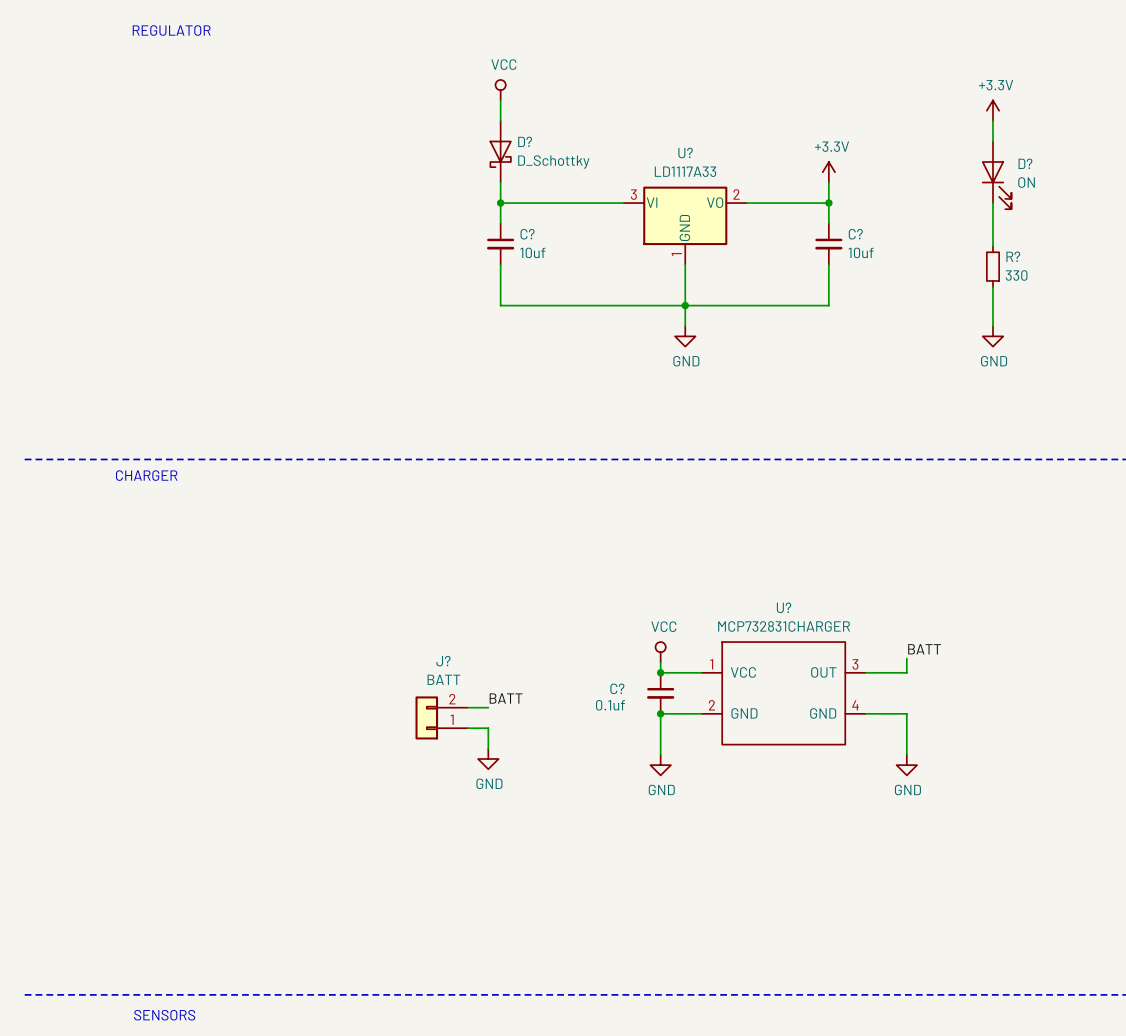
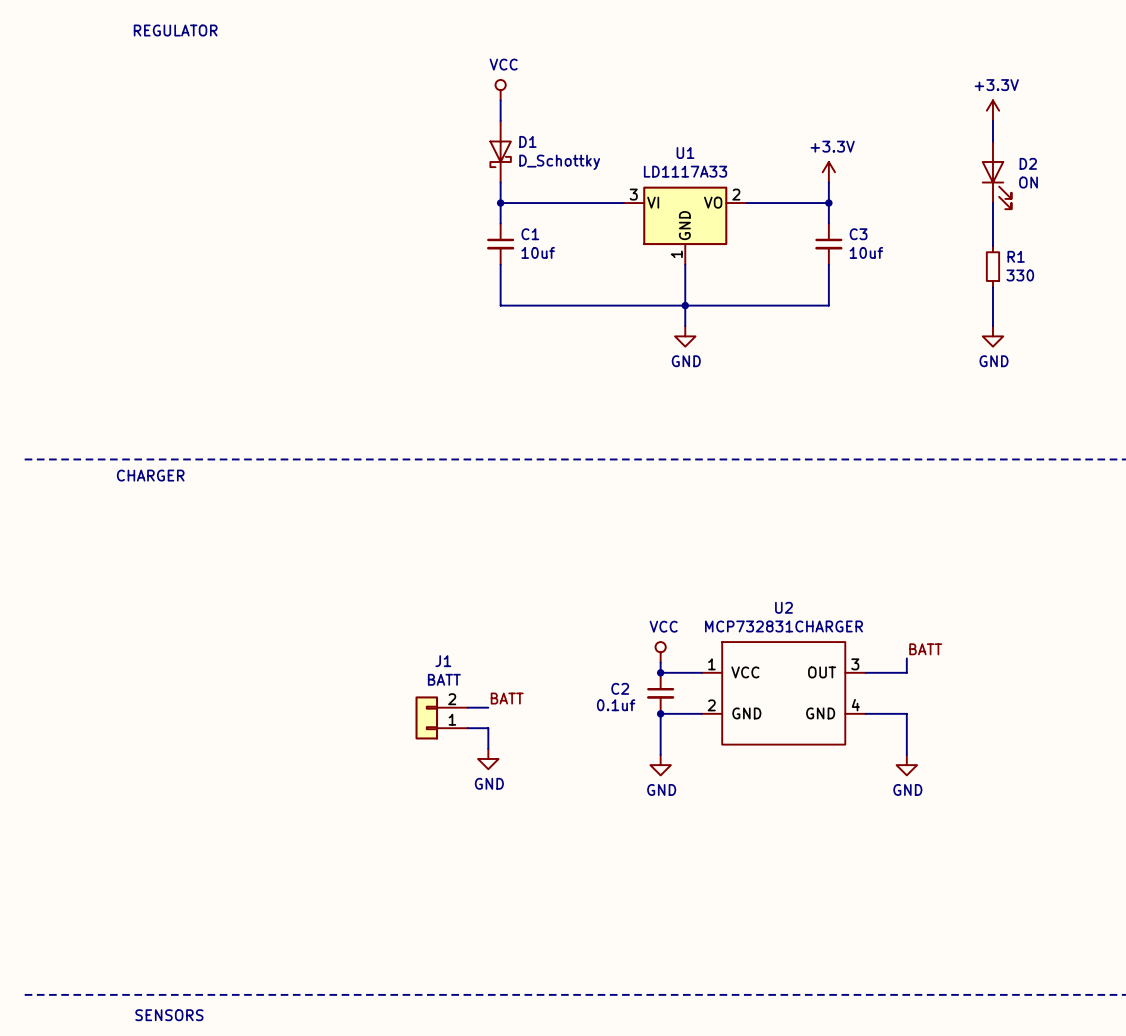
D? name: D? (525, 141) -> D1 (527, 141)
U? name: U? (685, 152) -> U1 (685, 153)
D? name: D? (1025, 163) -> D2 (1028, 163)
C? name: C? (527, 234) -> C1 (530, 234)
C? name: C? (855, 234) -> C3 (858, 234)
R? name: R? (1013, 256) -> R1 (1016, 256)
U? name: U? (784, 607) -> U2 (783, 607)
J? name: J? (443, 661) -> J1 (443, 661)
C? name: C? (617, 688) -> C2 (620, 688)

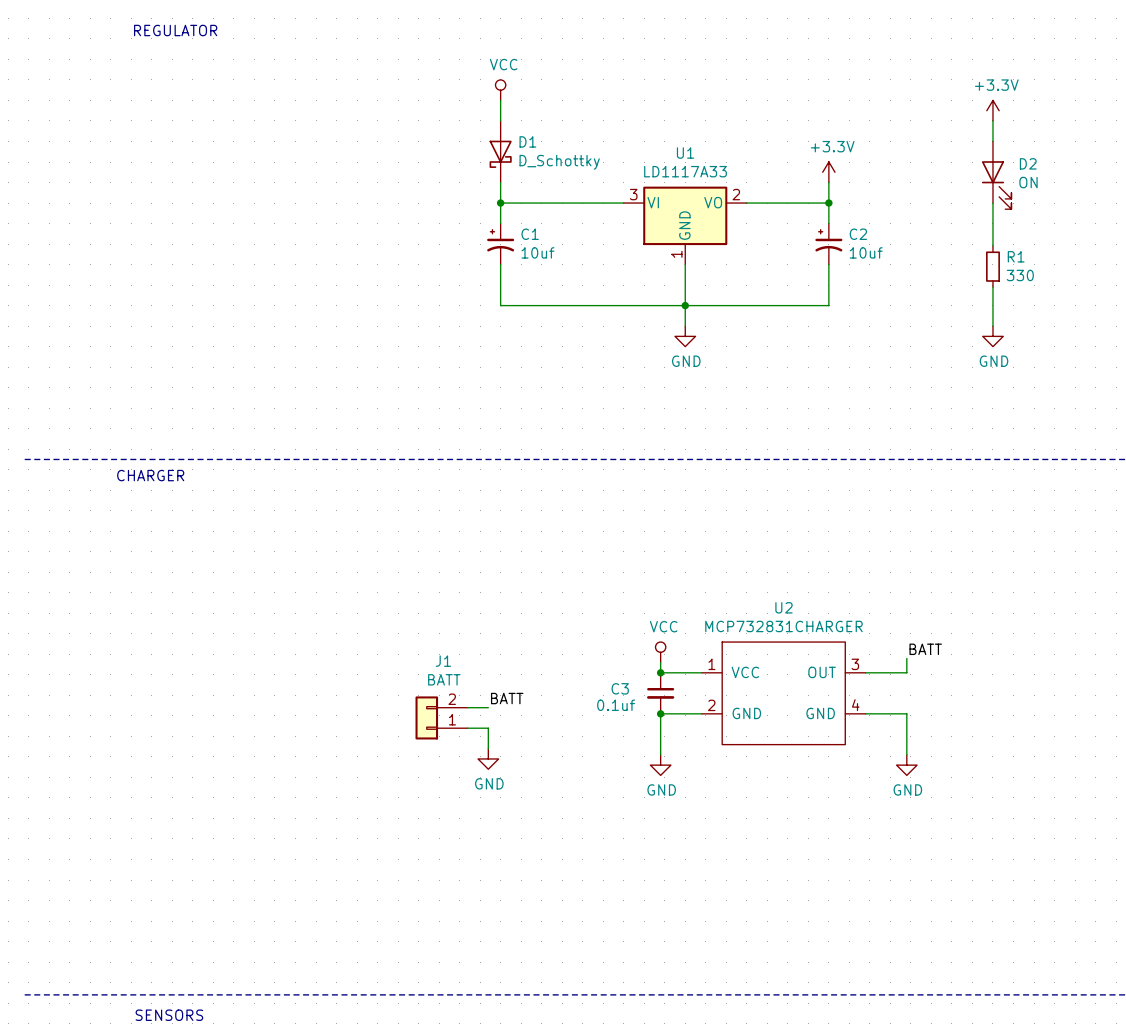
C1 symbol: [486, 223, 515, 265] -> [487, 223, 515, 265]
C3: 10uf (828, 244) -> none
C2: none -> 10uf (828, 244)
C2 name: C2 (620, 688) -> C3 (620, 688)

